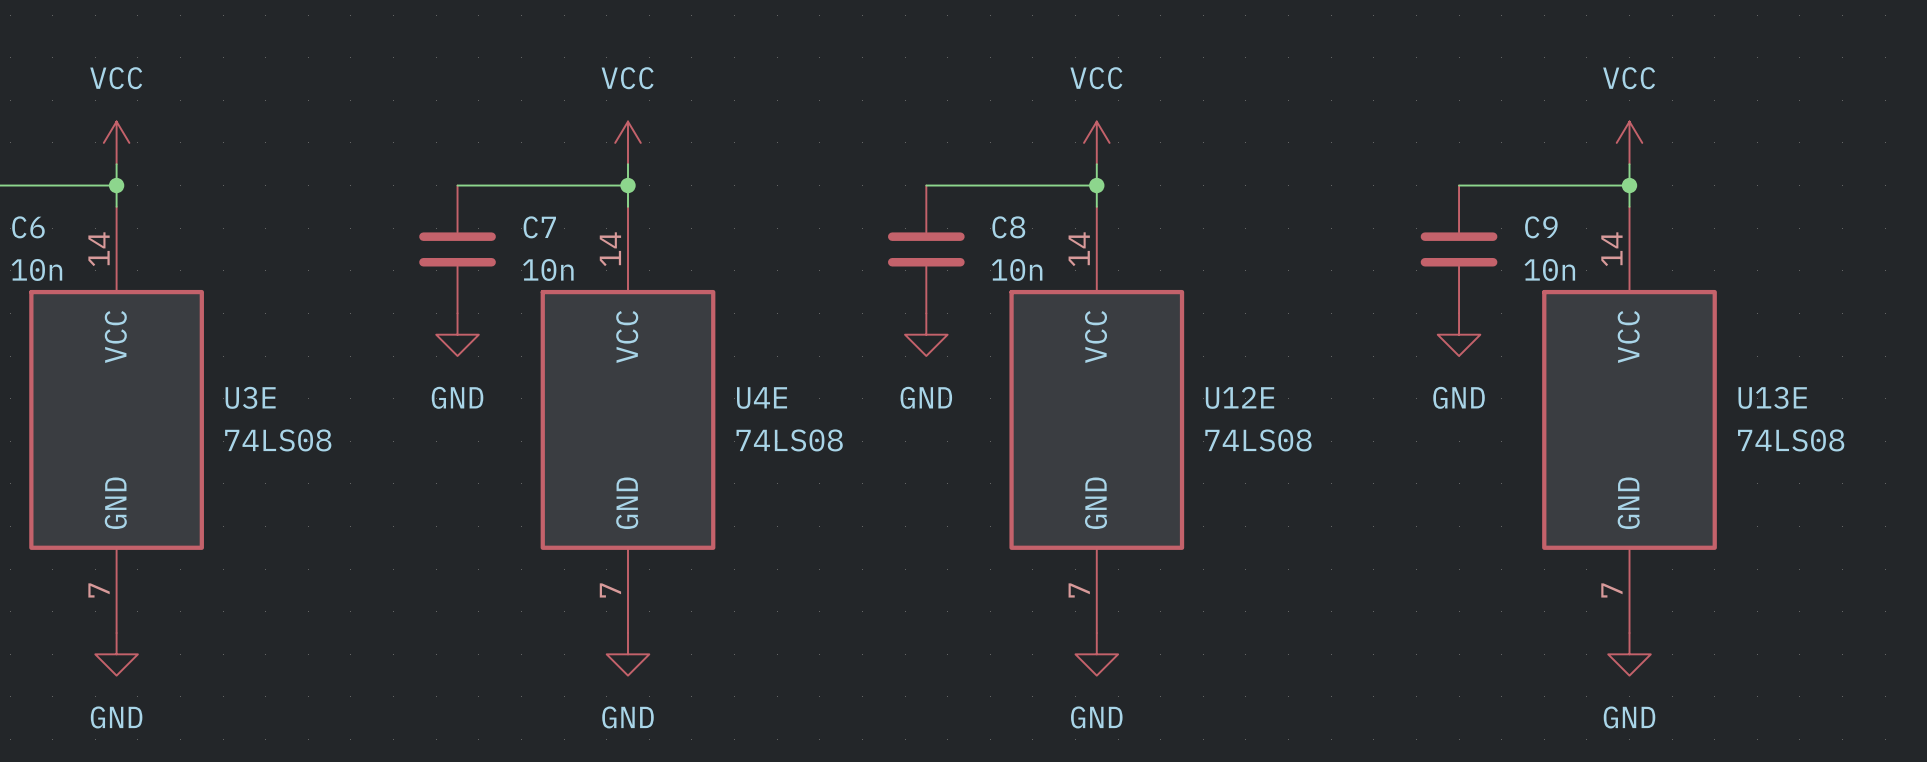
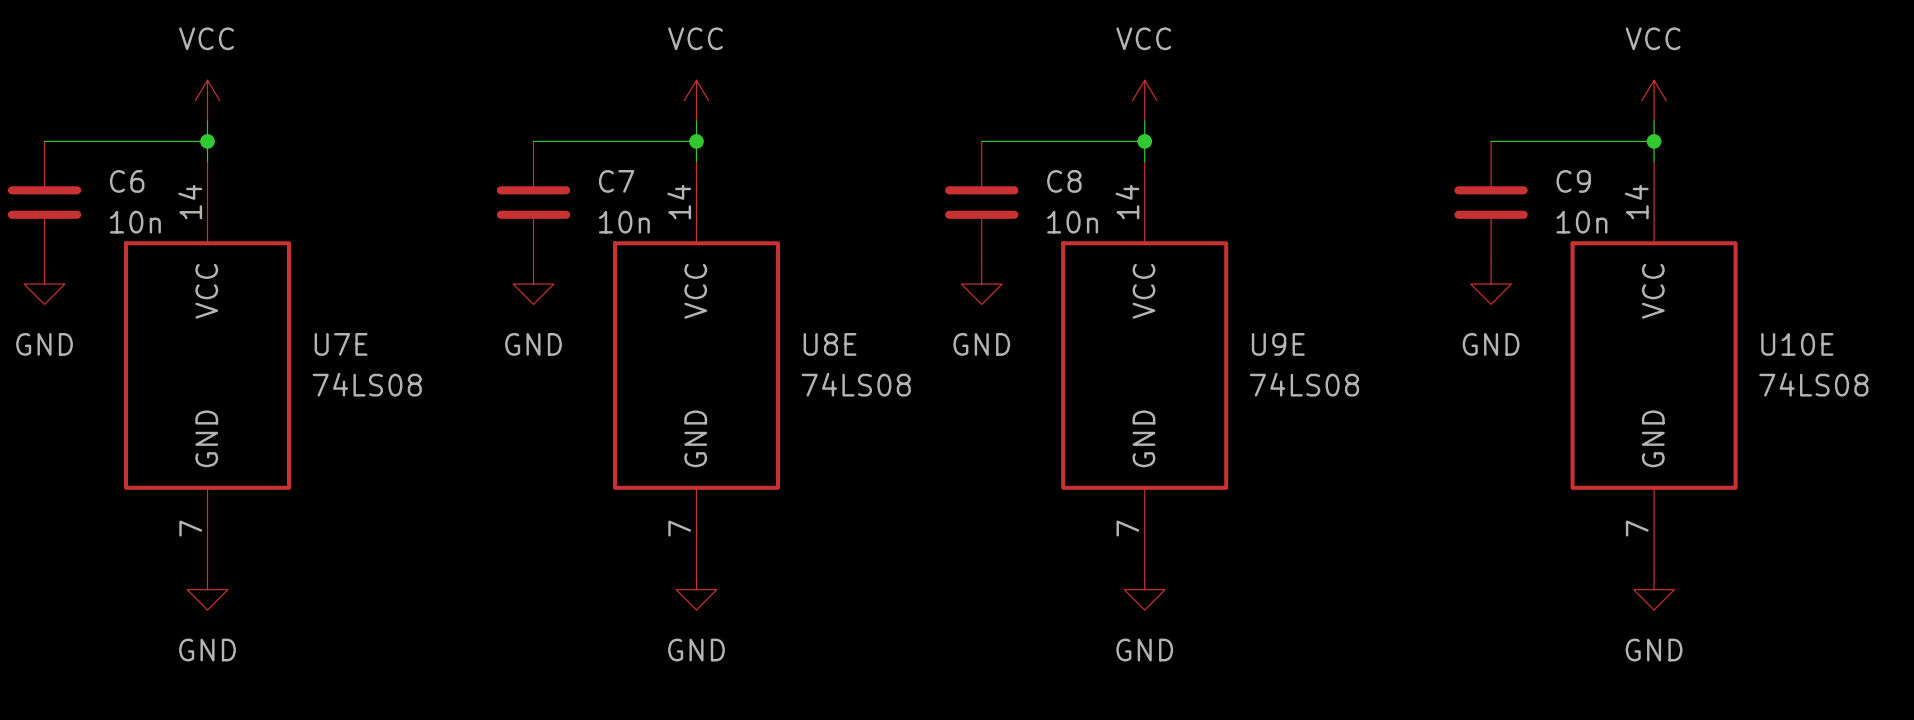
U3E name: U3E (250, 397) -> U7E (341, 344)
U12E name: U12E (1239, 397) -> U9E (1278, 344)
U13E name: U13E (1772, 397) -> U10E (1797, 344)
U4E name: U4E (762, 398) -> U8E (830, 344)

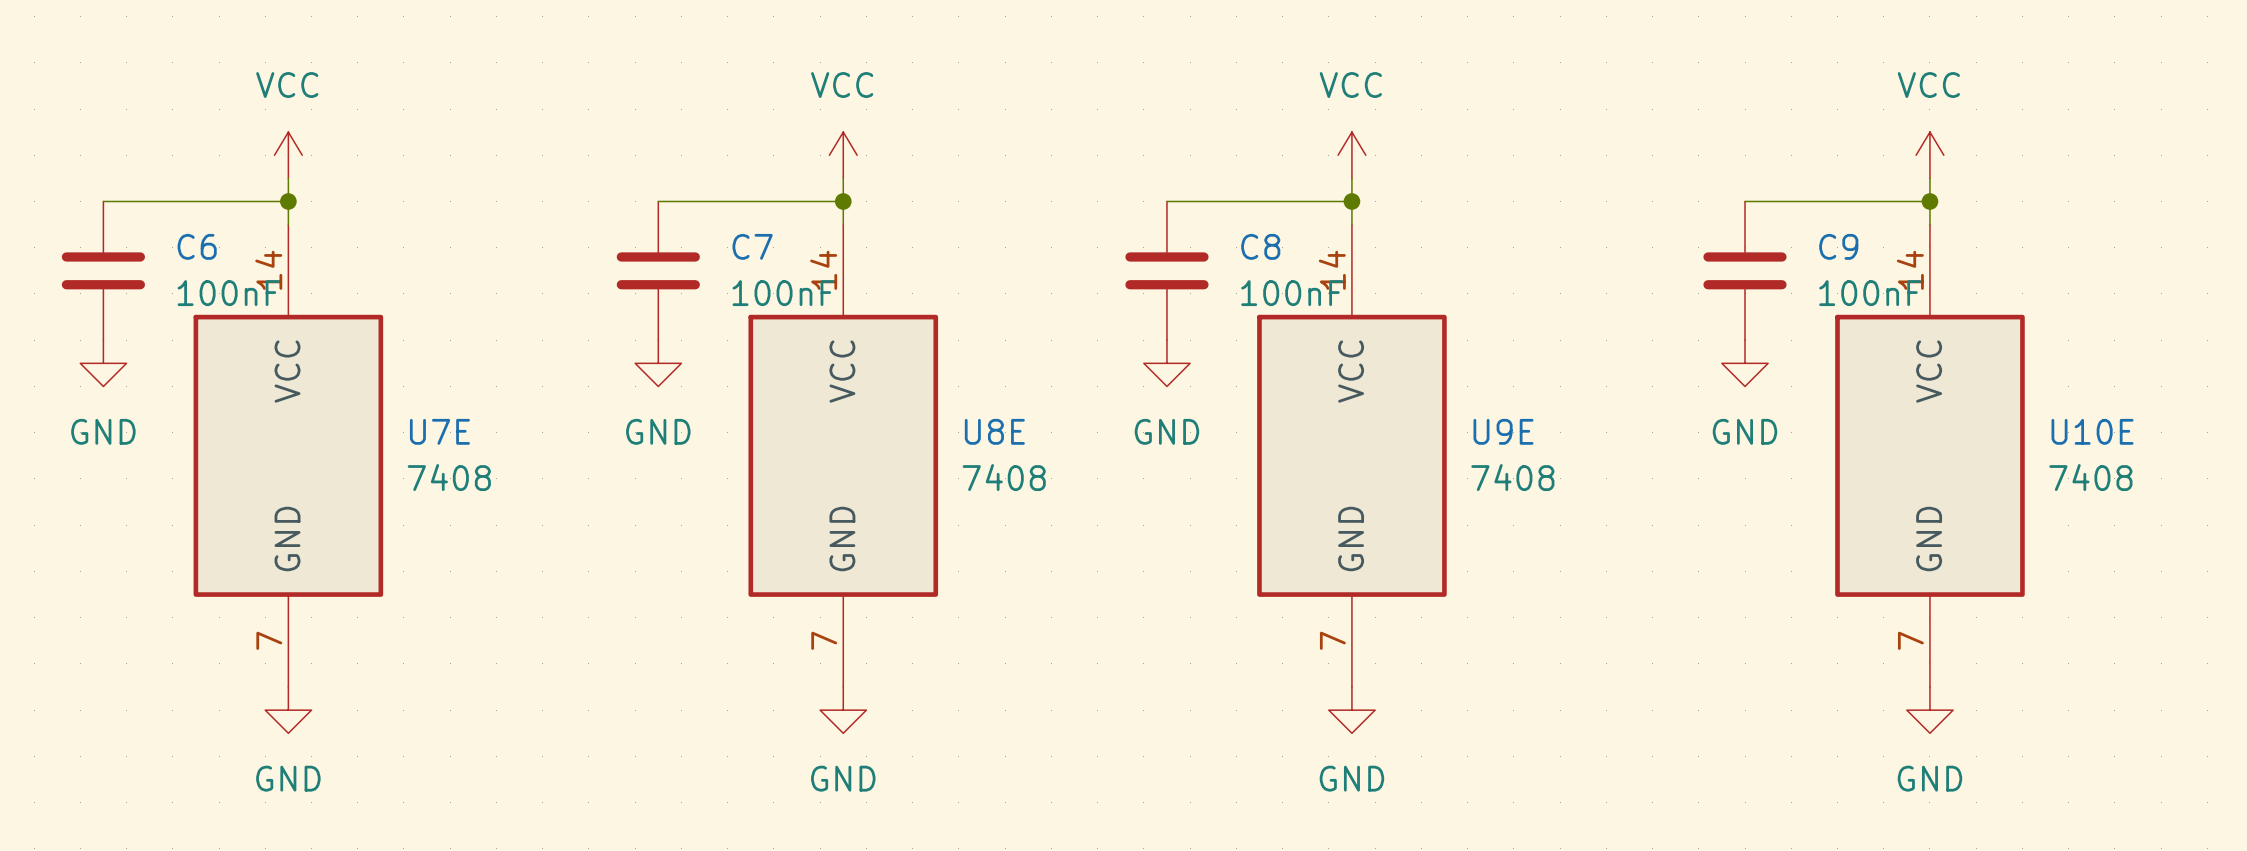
C6 value: 10n (135, 222) -> 100nF (228, 293)
C7 value: 10n (624, 222) -> 100nF (783, 293)
C8 value: 10n (1072, 222) -> 100nF (1292, 293)
C9 value: 10n (1581, 222) -> 100nF (1870, 293)
U7E value: 74LS08 (367, 384) -> 7408 (449, 477)
U8E value: 74LS08 (856, 384) -> 7408 (1004, 477)
U9E value: 74LS08 (1304, 384) -> 7408 (1512, 477)
U10E value: 74LS08 (1813, 384) -> 7408 (2090, 477)

